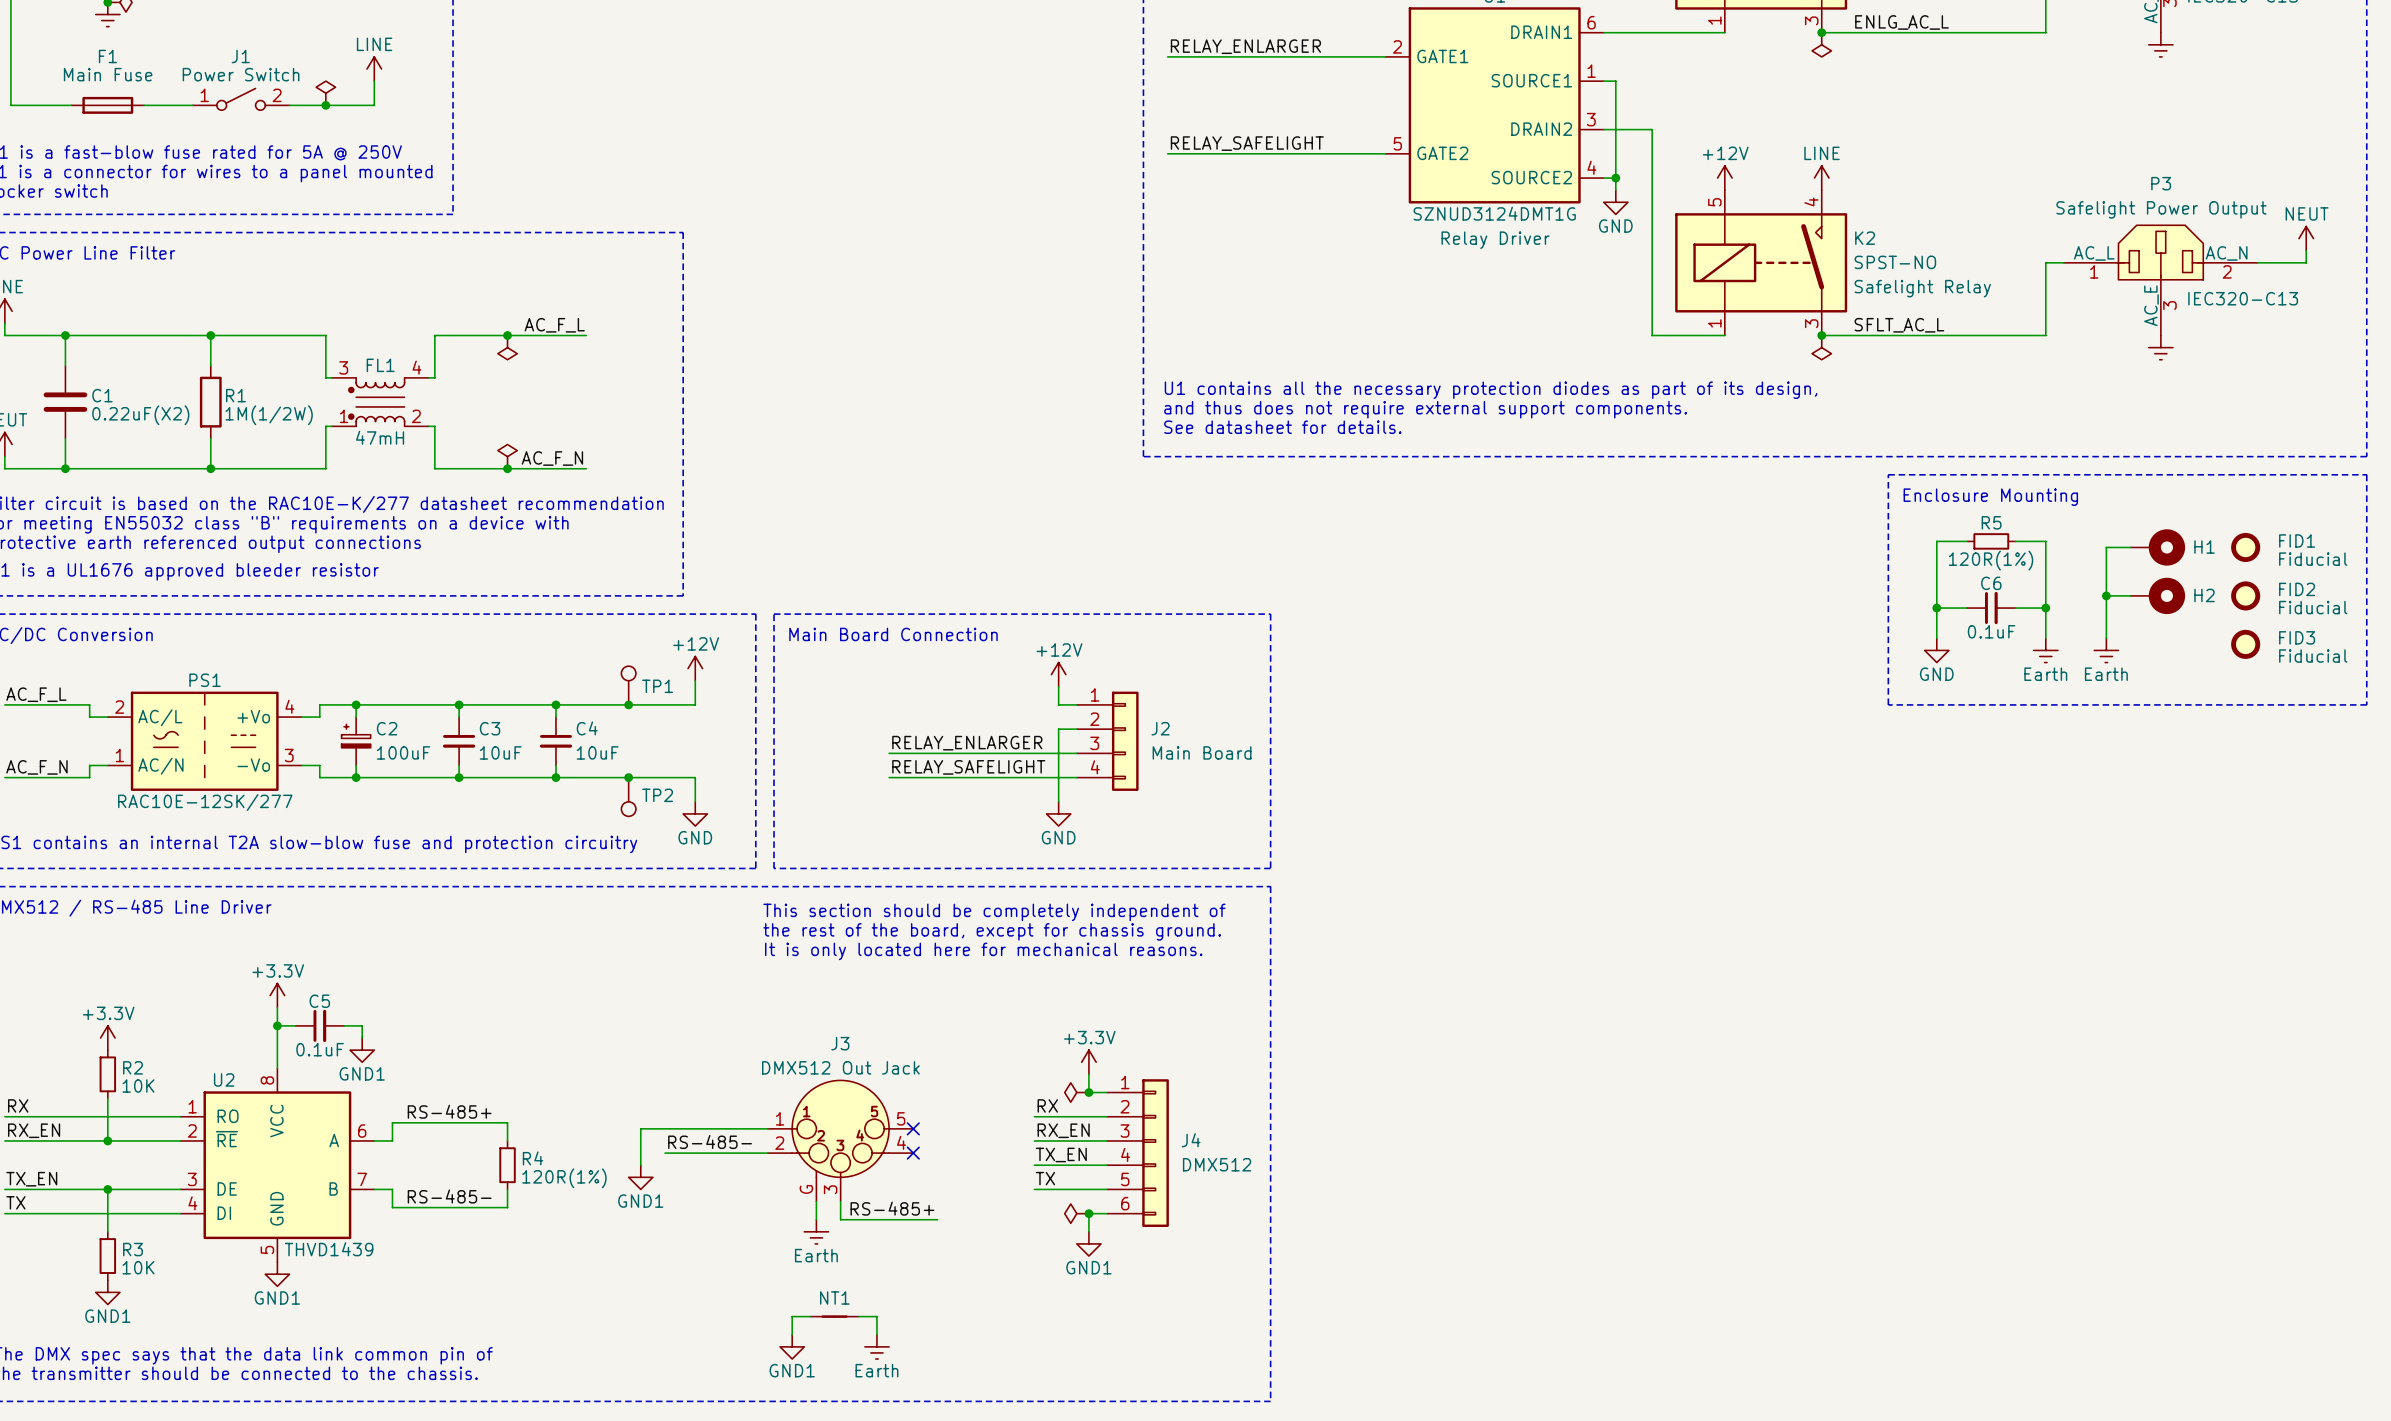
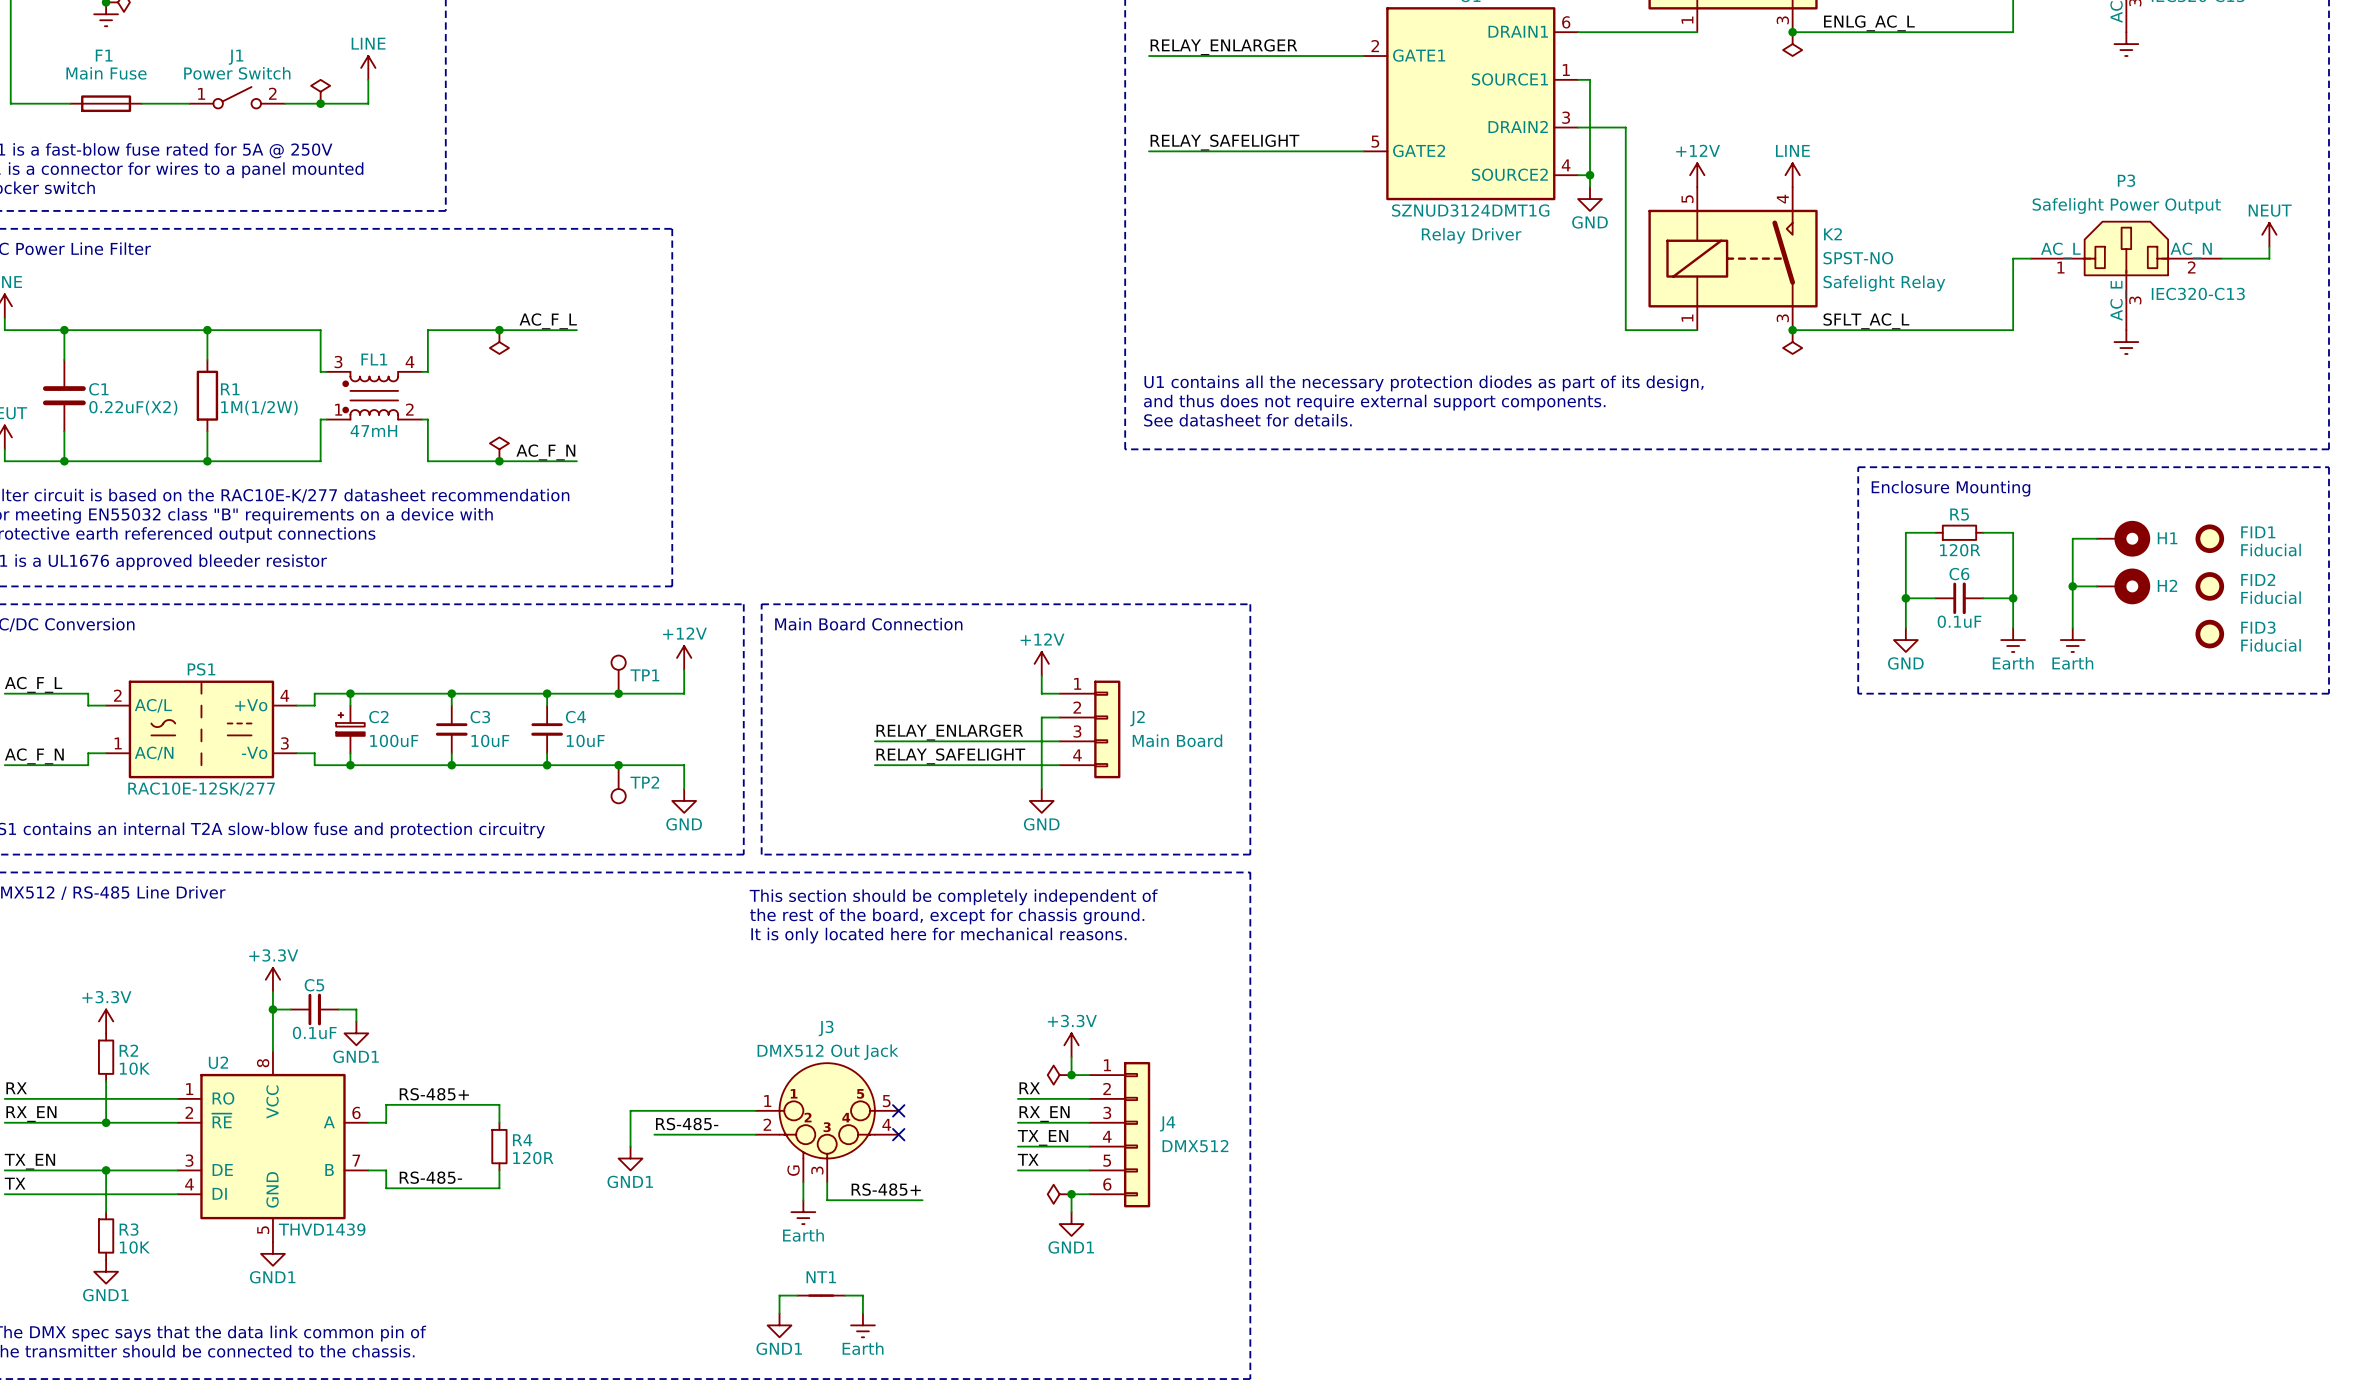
R5 value: 120R(1%) (1991, 560) -> 120R (1960, 550)
R4 value: 120R(1%) (564, 1178) -> 120R (533, 1158)

